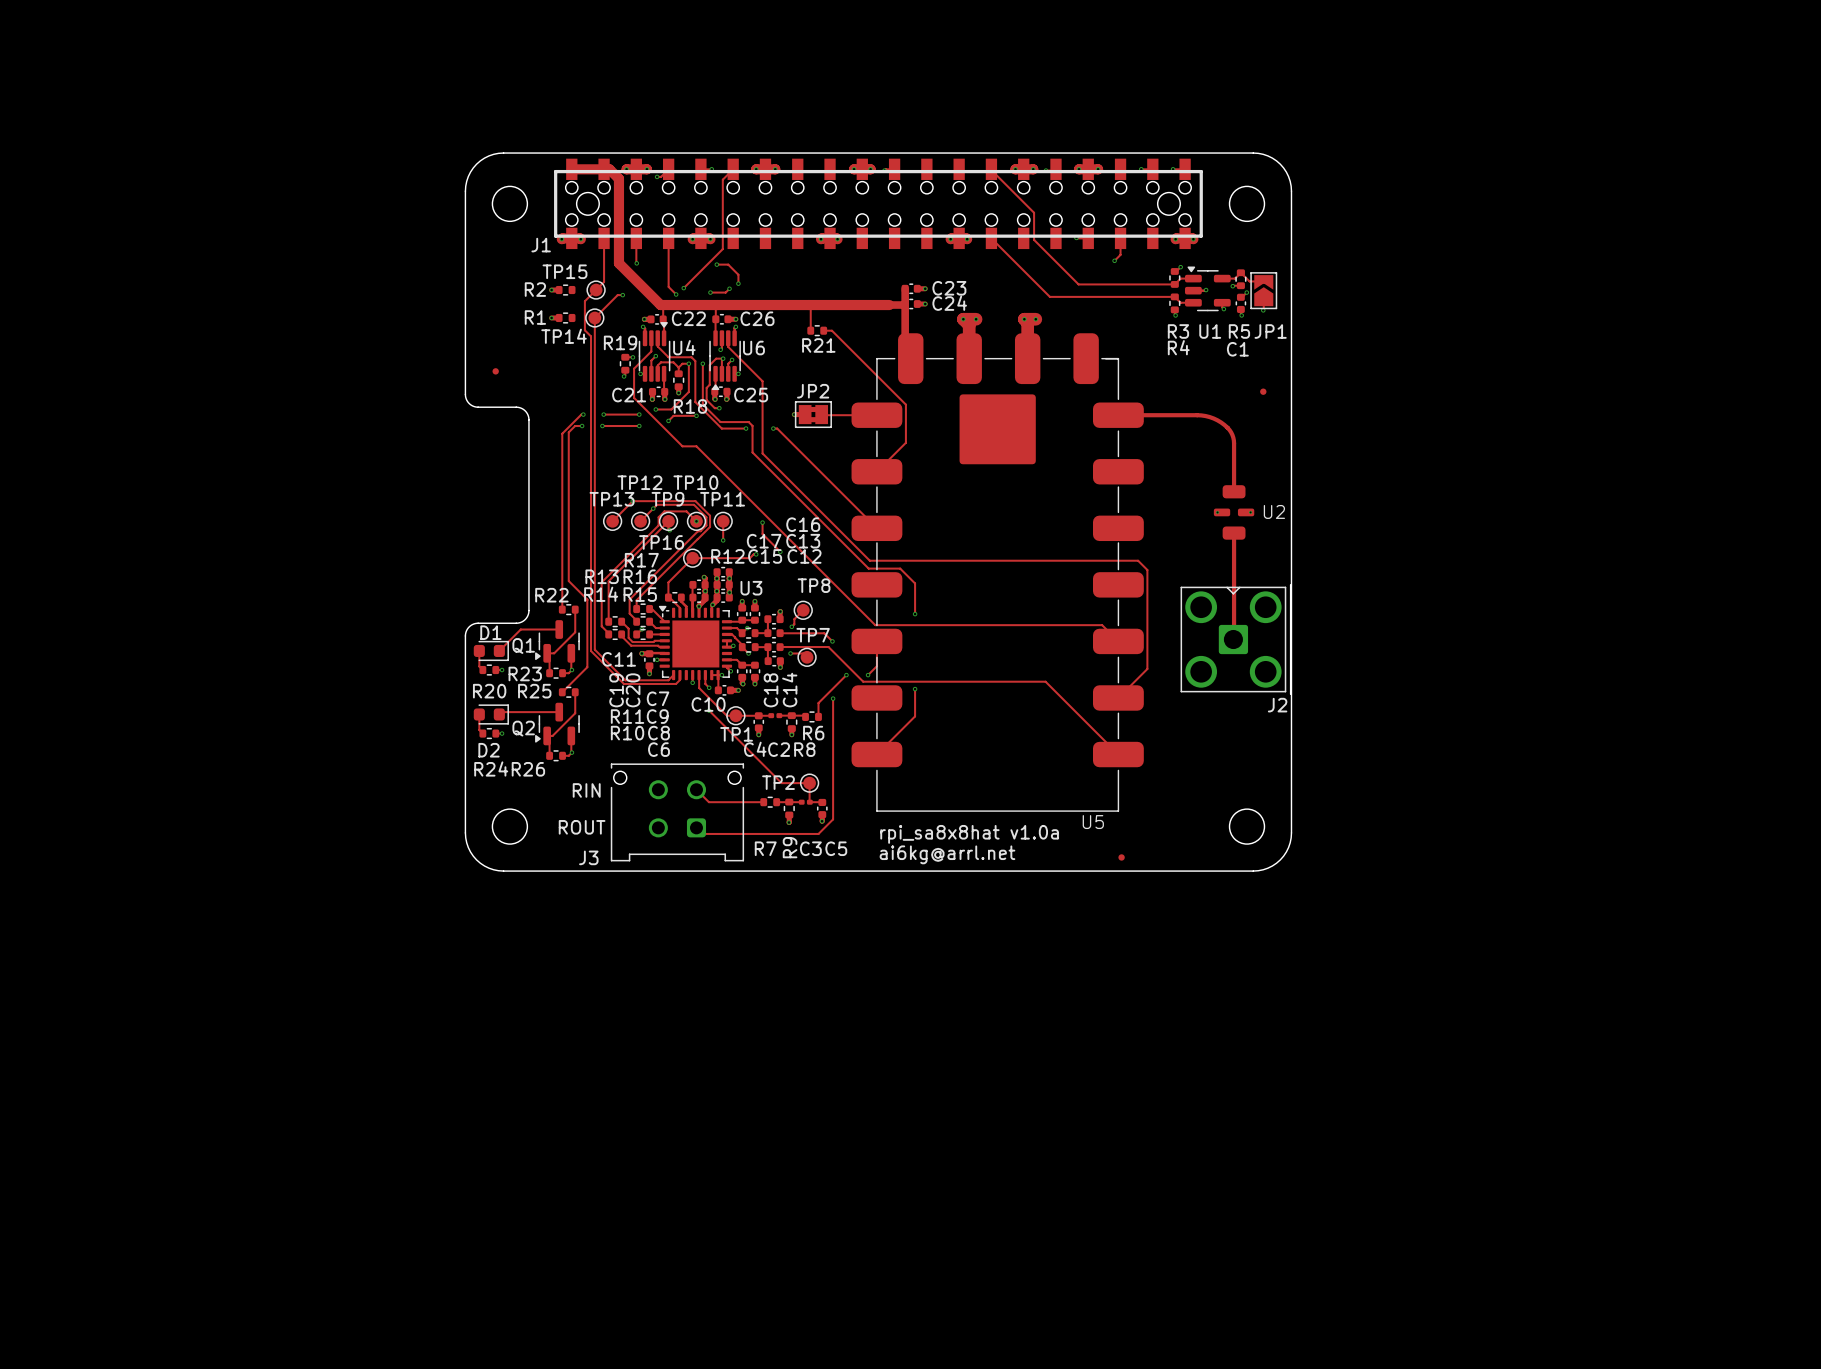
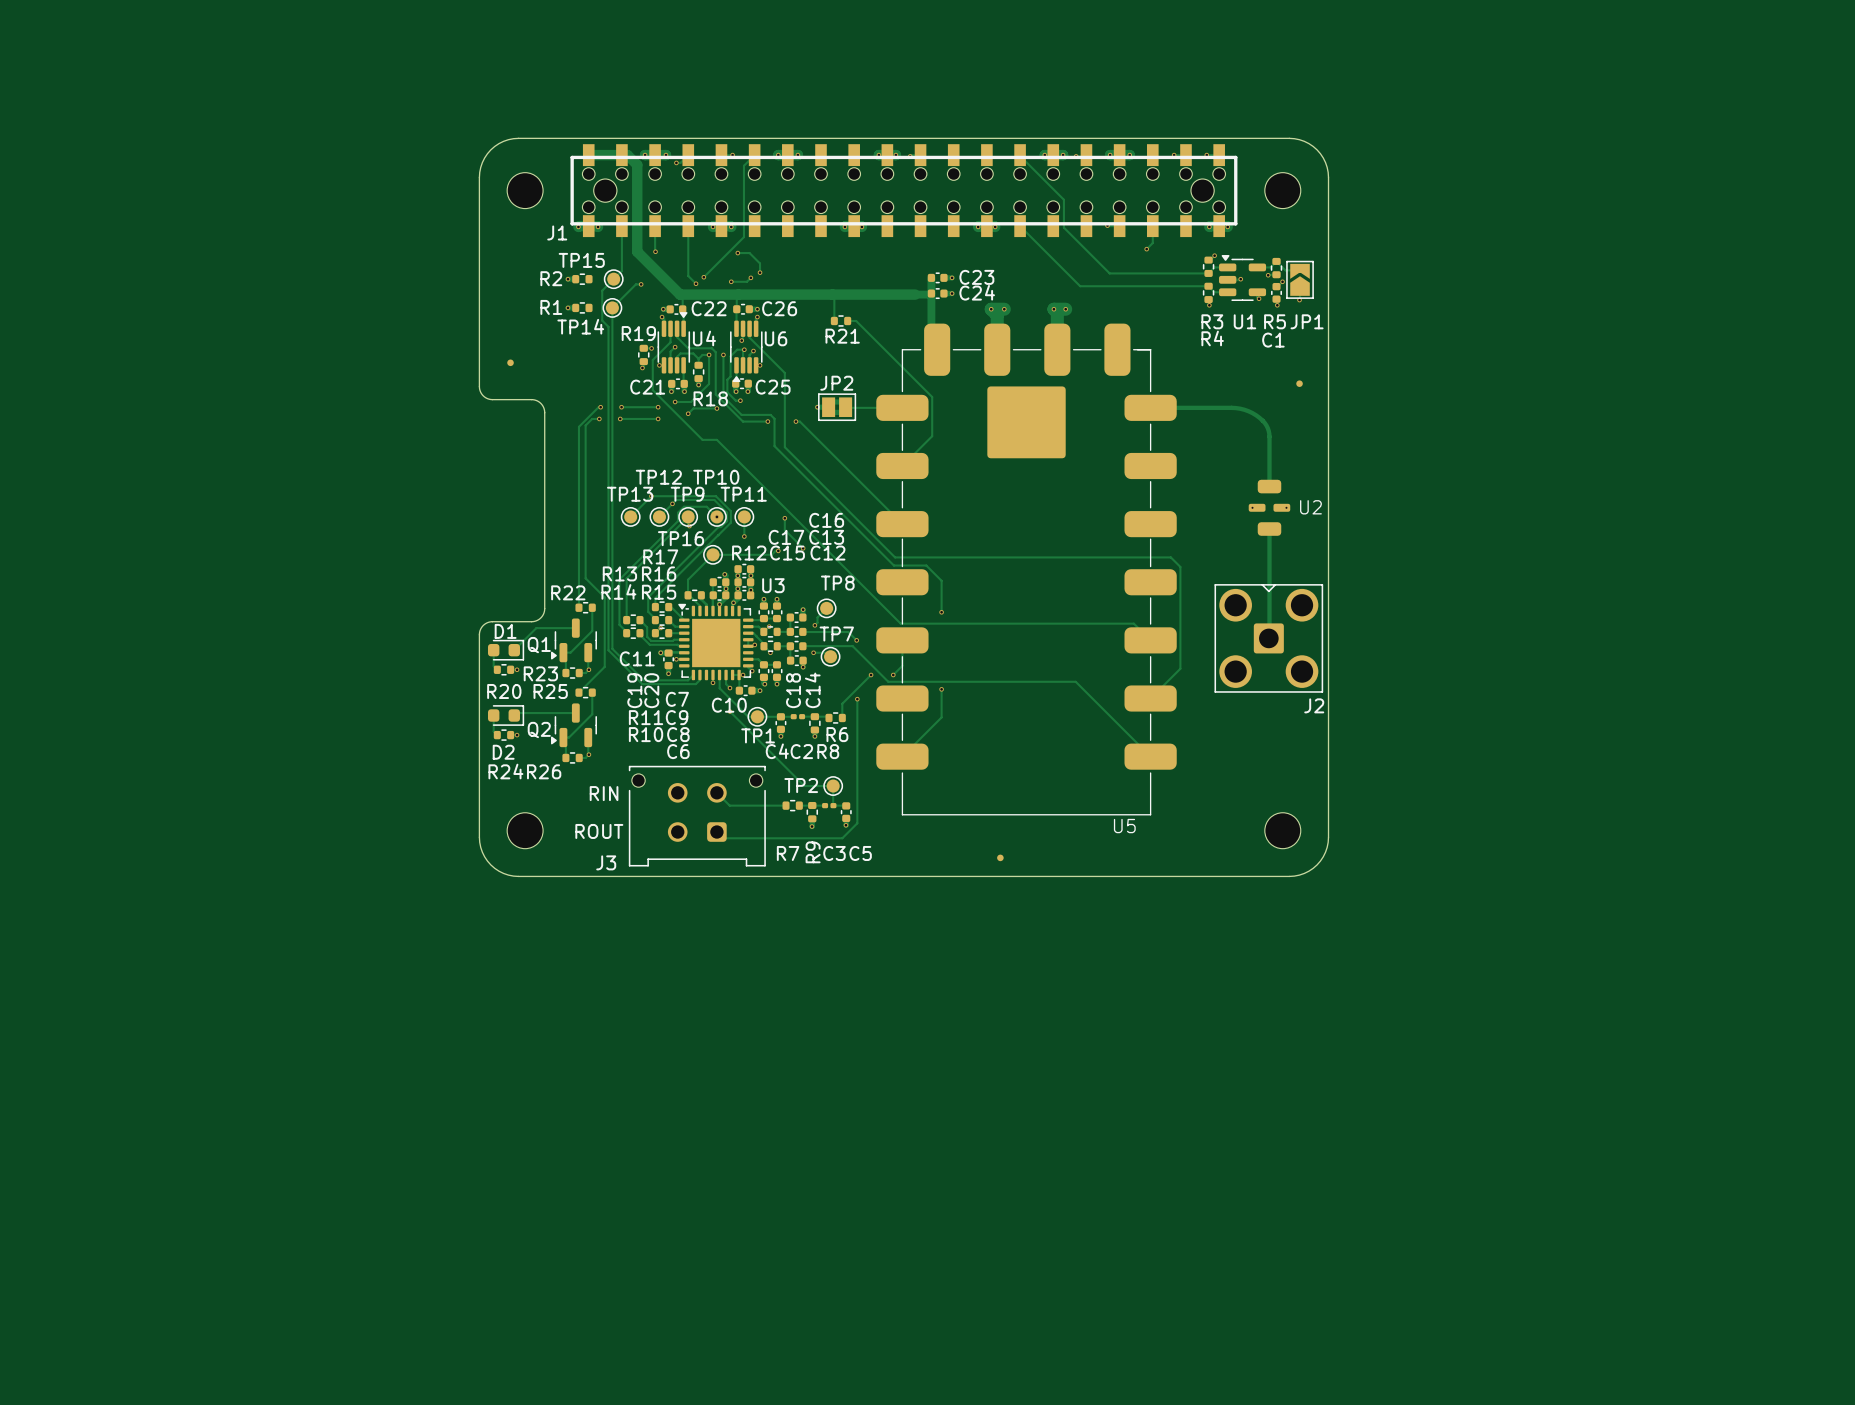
J2 footprint: [1180, 584, 1292, 695] -> [1214, 584, 1324, 693]
text: rpi_sa8x8hat v1.0a (969, 834) -> none
text: ai6kg@arrl.net (947, 854) -> none
part position: (1121, 857) -> (1000, 857)

